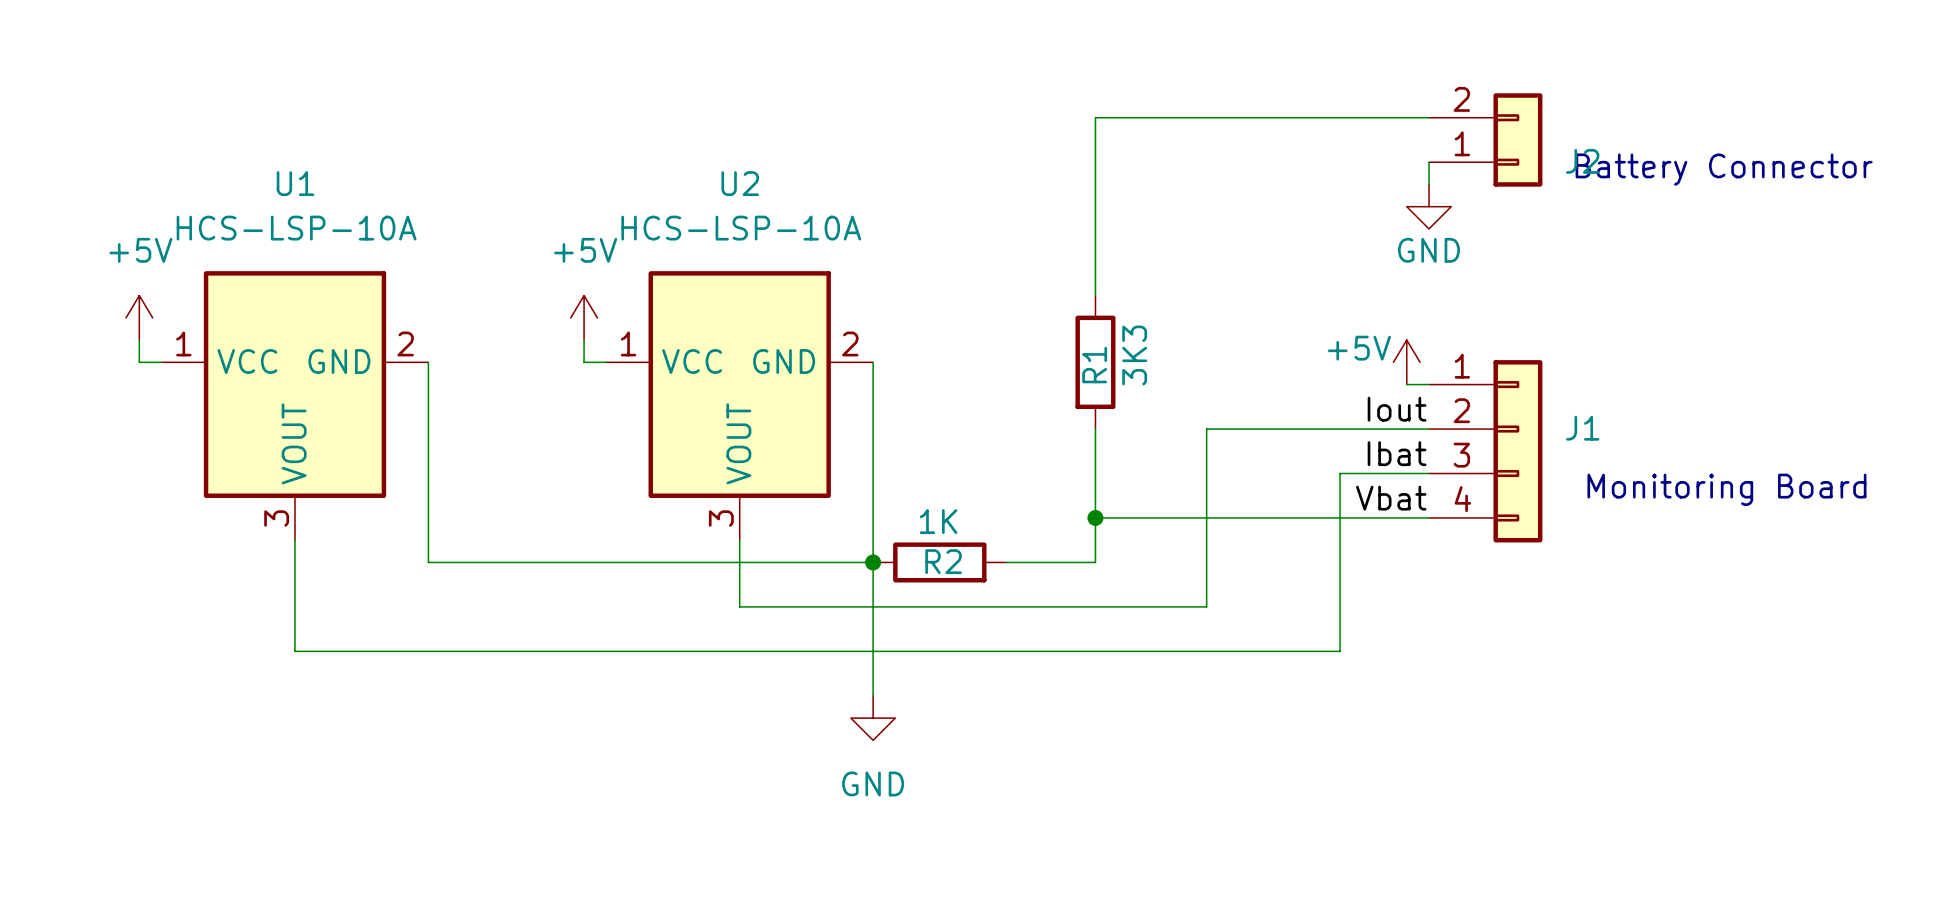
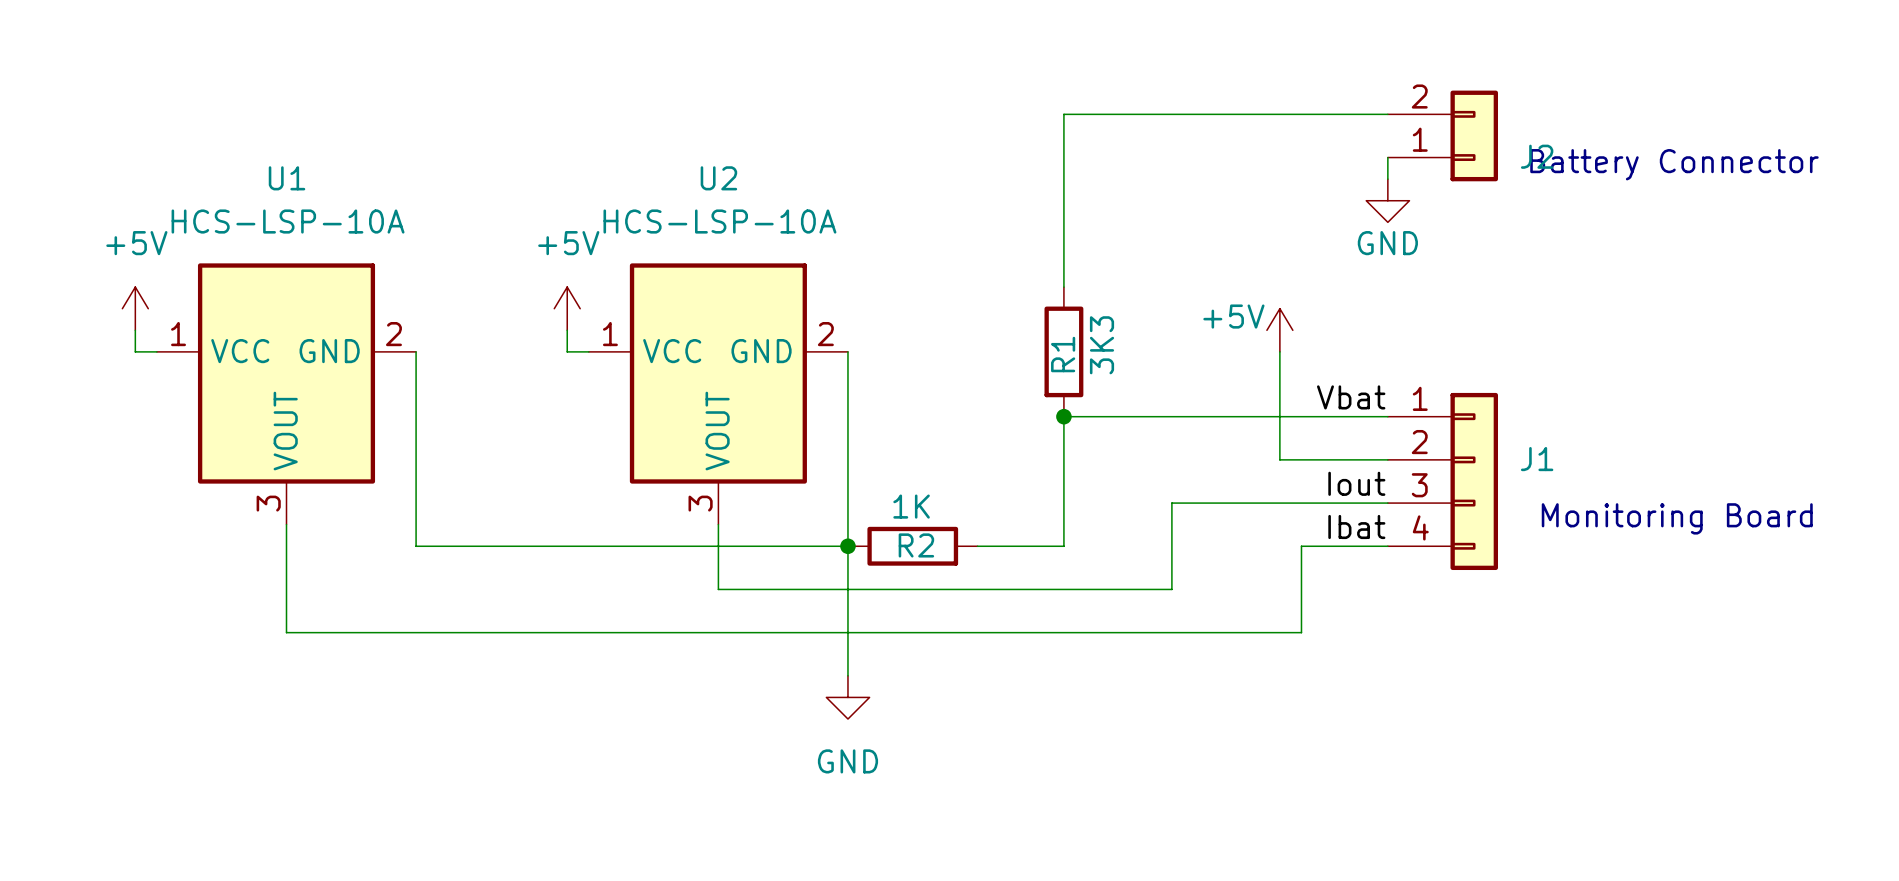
wire: none -> (1279, 351) (1279, 459) (1301, 459)
power symbol position: +5V (1406, 362) -> +5V (1279, 330)
wire: (1406, 384) (1429, 384) -> none
label: Iout (1397, 409) -> Vbat (1351, 397)
wire: (1206, 429) (1206, 517) (1095, 517) -> (1171, 416) (1063, 416)
J1 position: (1485, 451) -> (1442, 481)
label position: Ibat (1397, 453) -> Ibat (1356, 526)
wire: (1340, 473) (1340, 562) -> (1387, 546) (1301, 546)
text position: Monitoring Board (1726, 489) -> Monitoring Board (1677, 518)
label: Vbat (1391, 498) -> Iout (1356, 483)
junction position: (1095, 517) -> (1063, 416)

